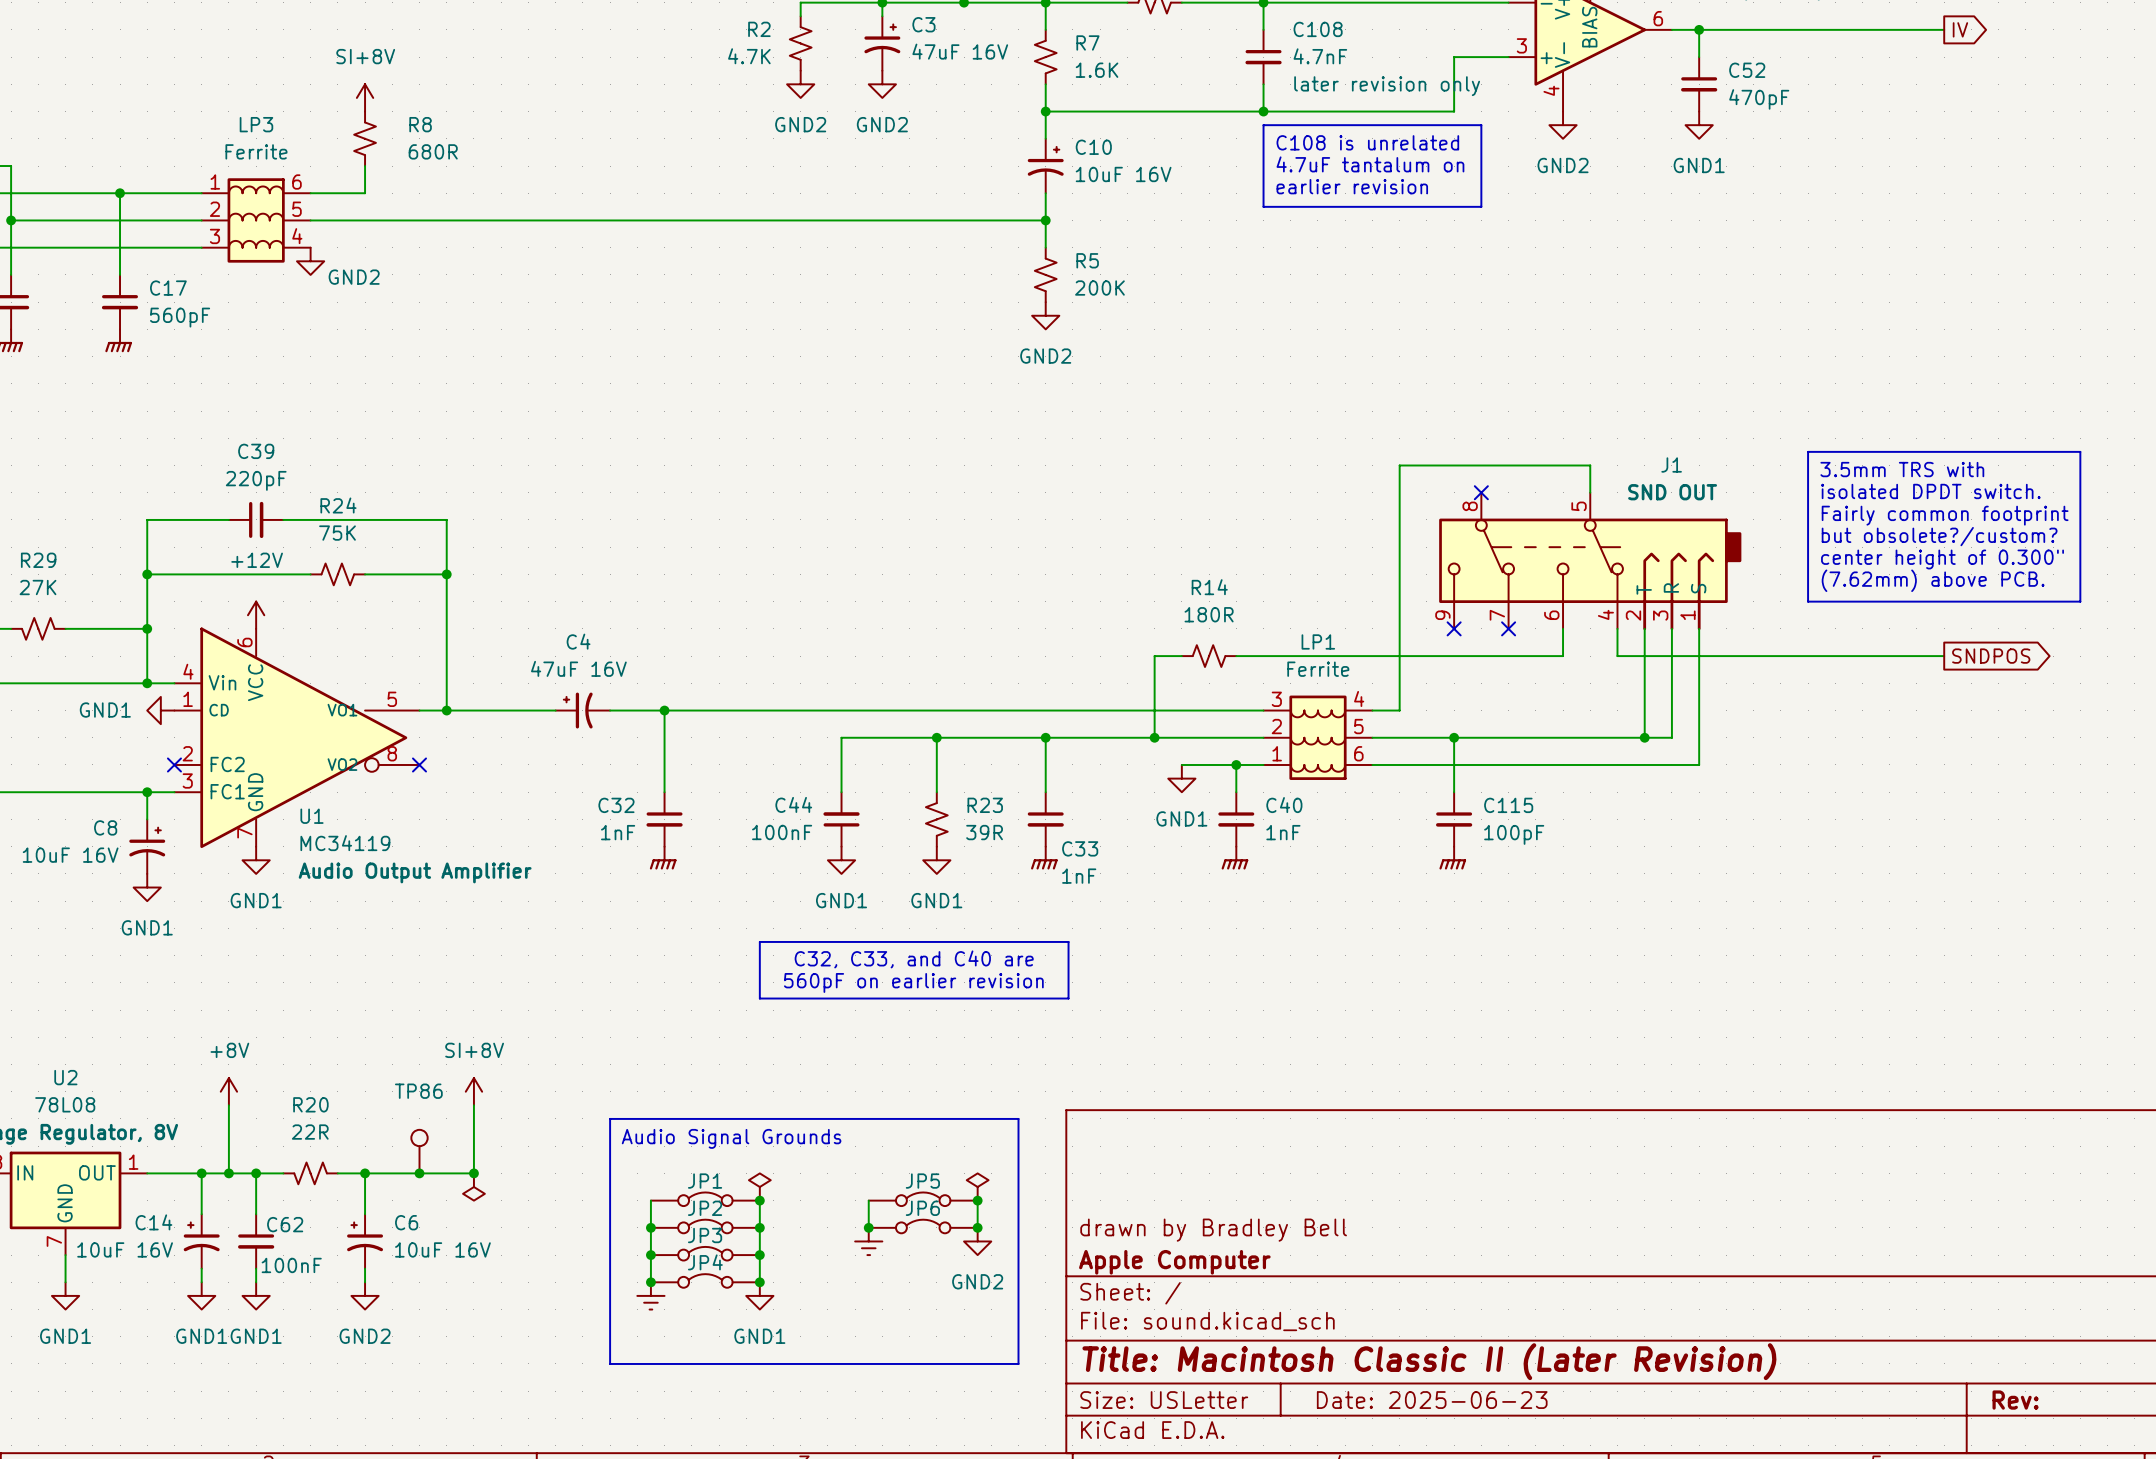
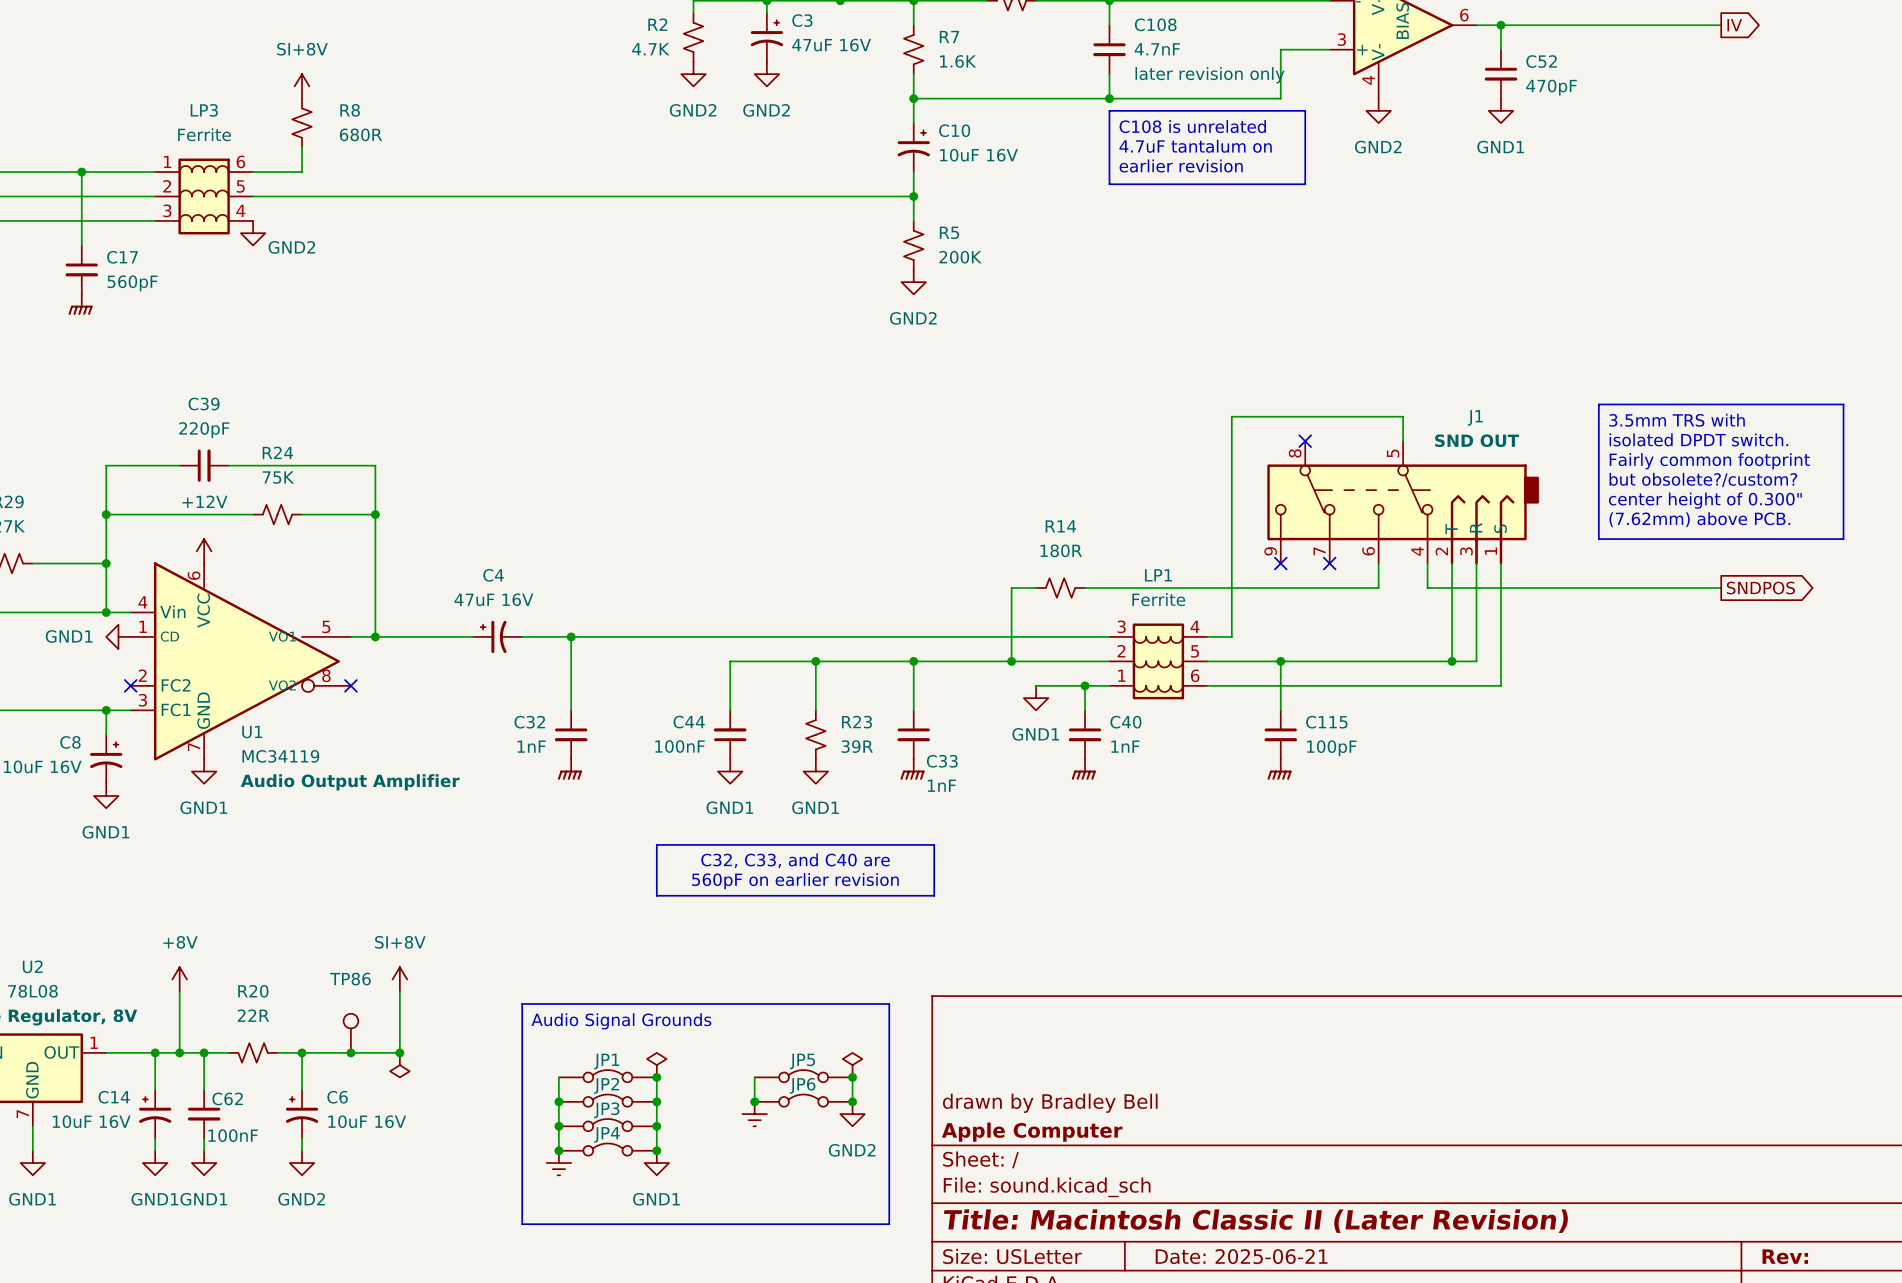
title block: Date: 2025-06-23 (1432, 1400) -> Date: 2025-06-21 (1241, 1256)

